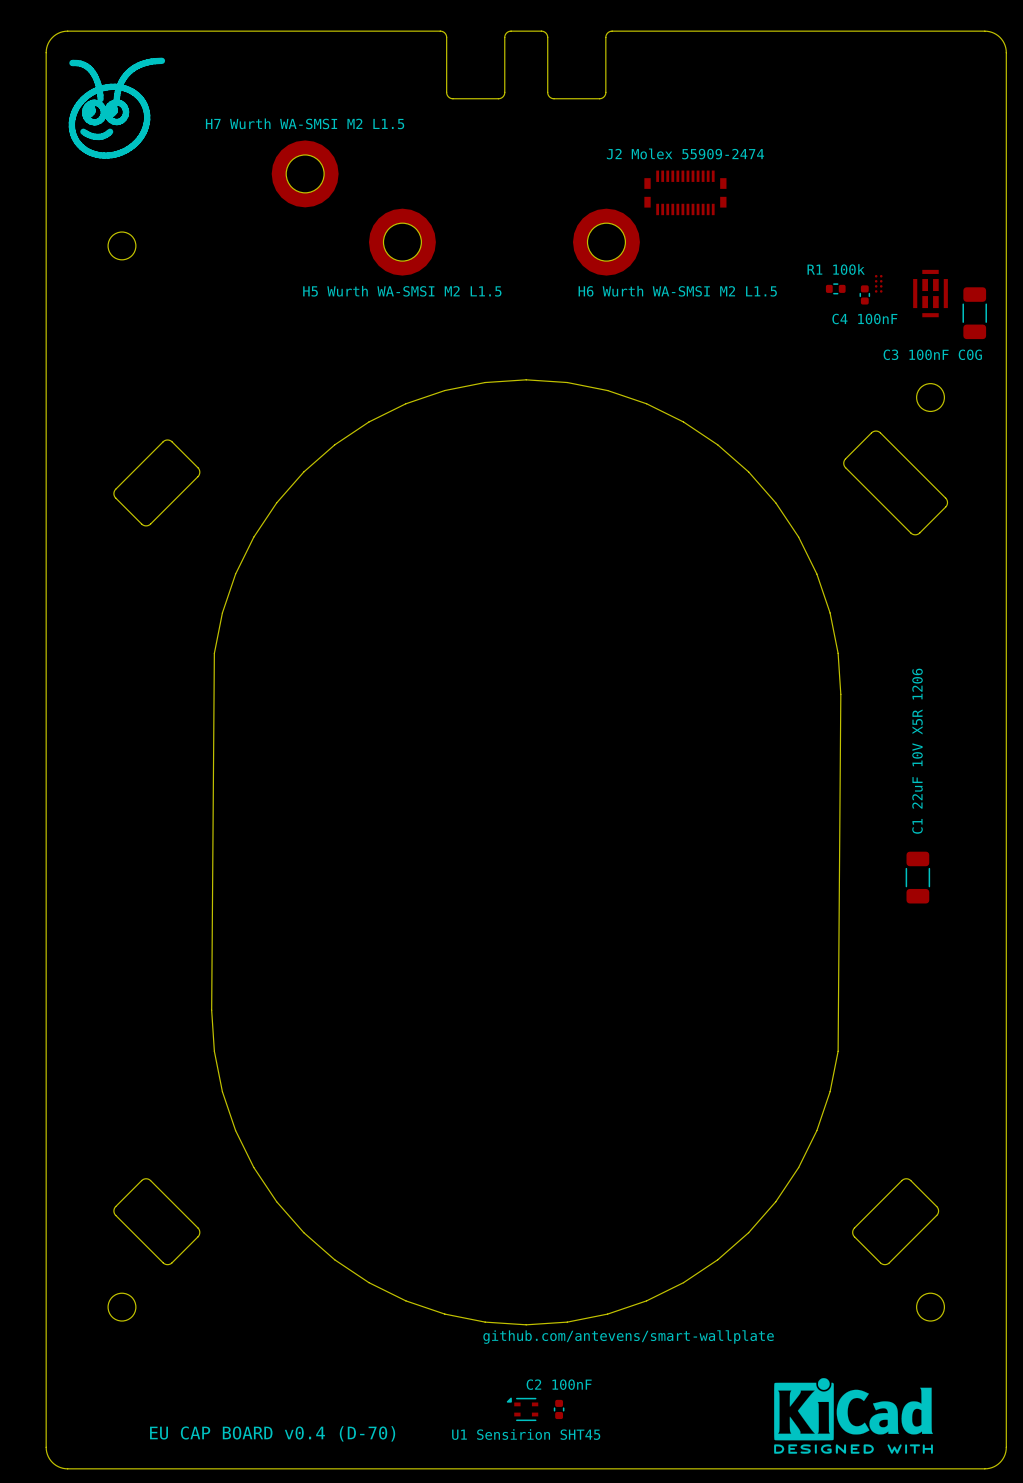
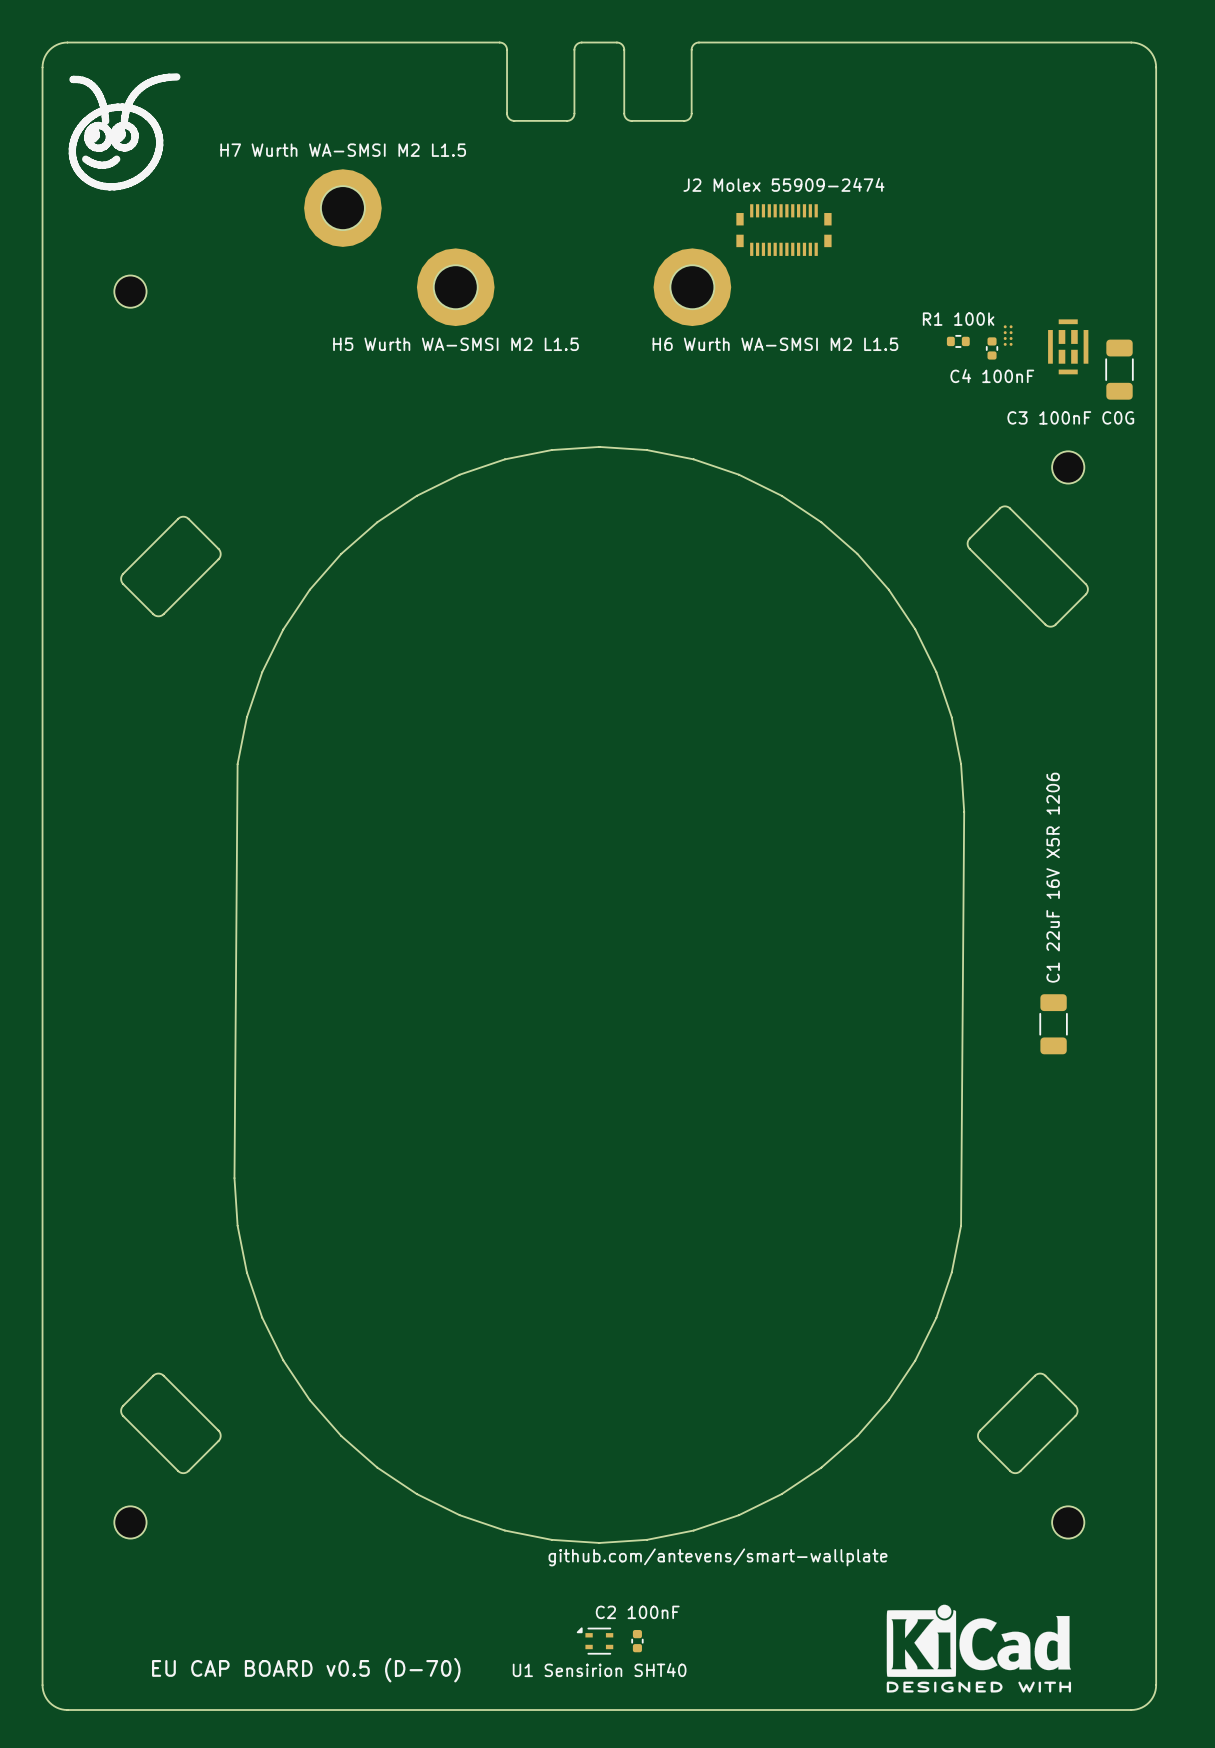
text: C1 22uF 10V X5R 1206 (917, 751) -> C1 22uF 16V X5R 1206 (1053, 877)
text: EU CAP BOARD v0.4 (D-70) (272, 1433) -> EU CAP BOARD v0.5 (D-70) (306, 1670)
text: U1 Sensirion SHT45 (526, 1434) -> U1 Sensirion SHT40 (599, 1670)

